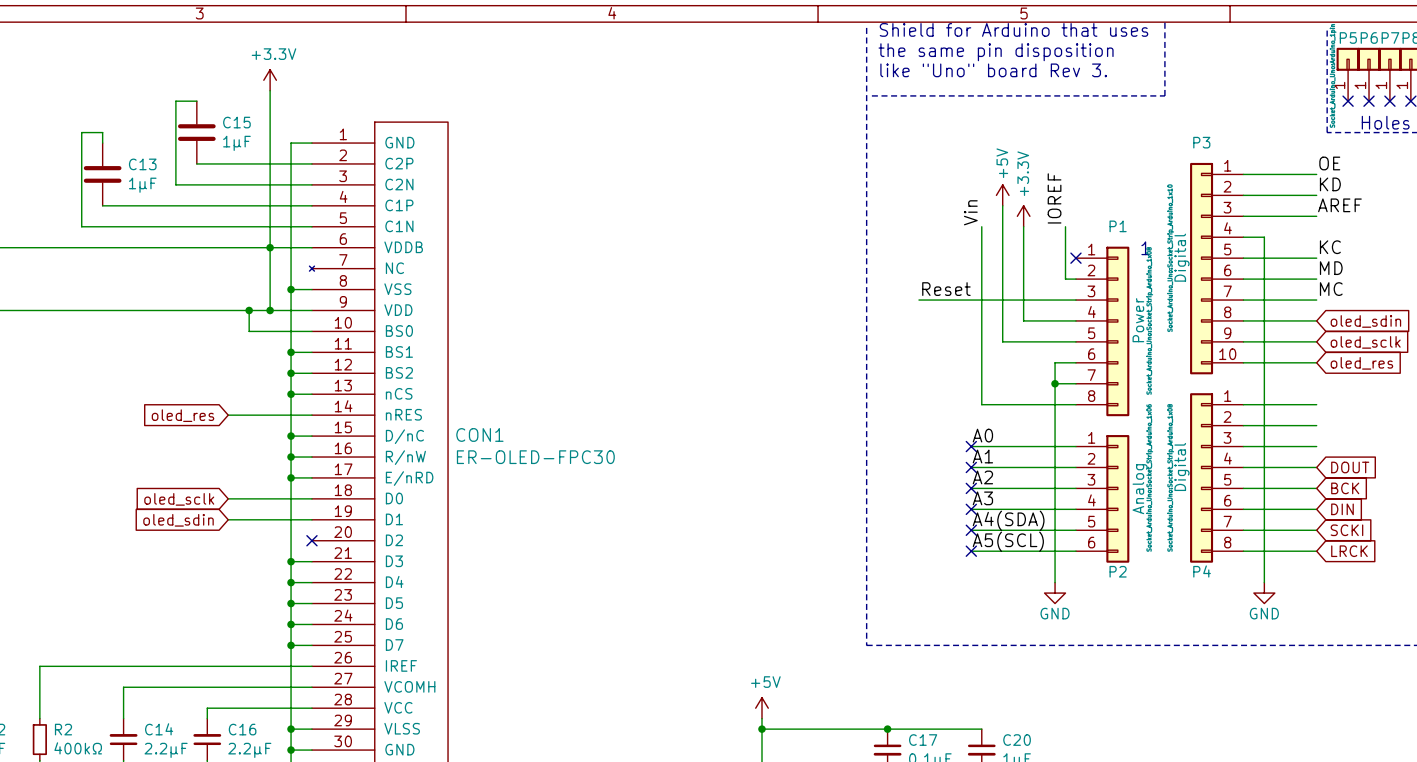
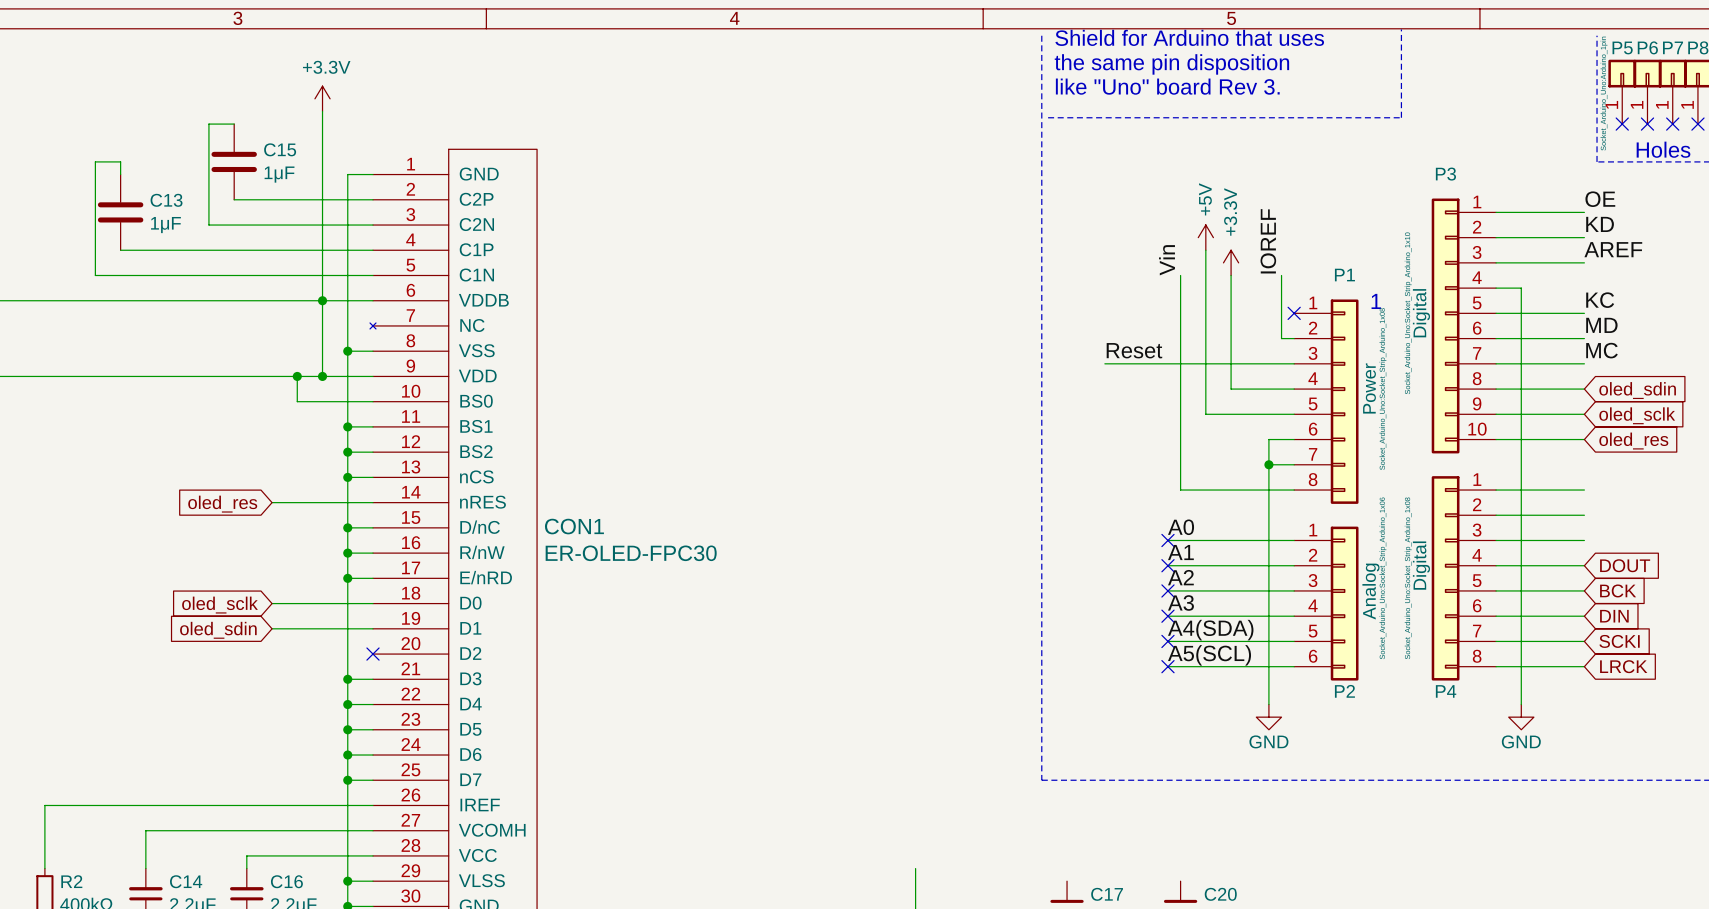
power symbol: +5V (761, 708) -> none
wire: (761, 729) (981, 729) -> none
junction: (761, 729) -> none
junction: (887, 729) -> none

